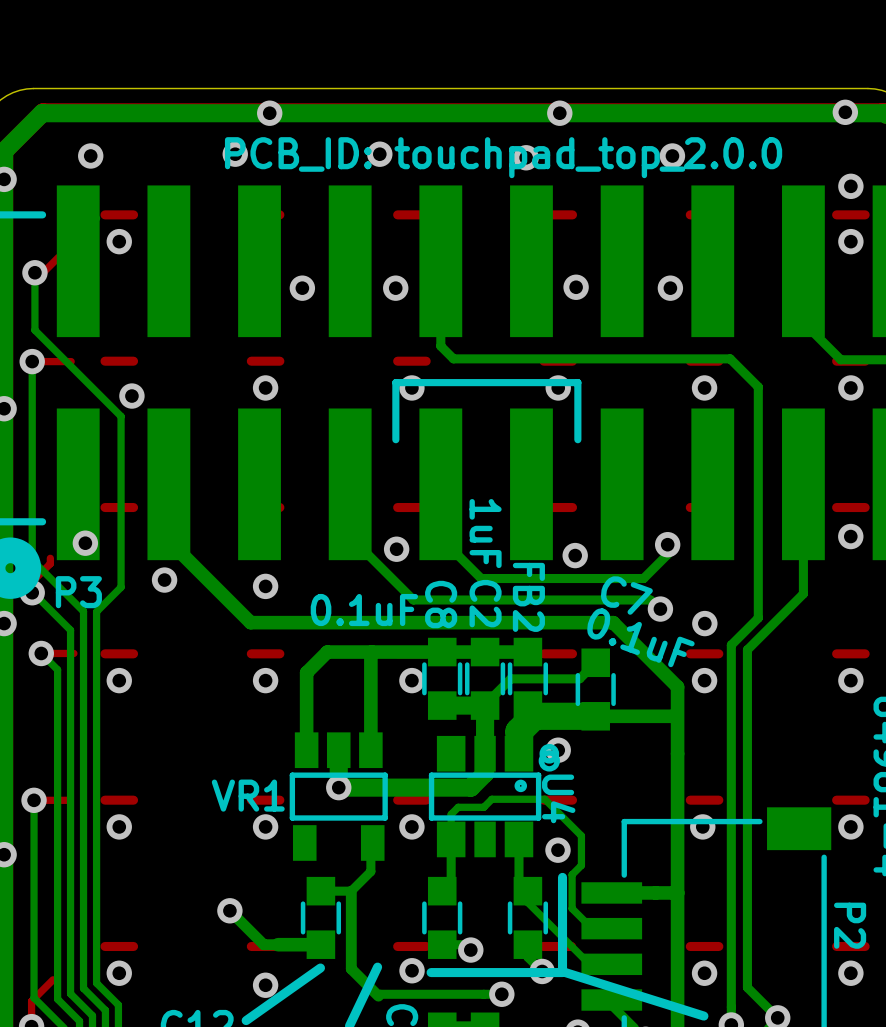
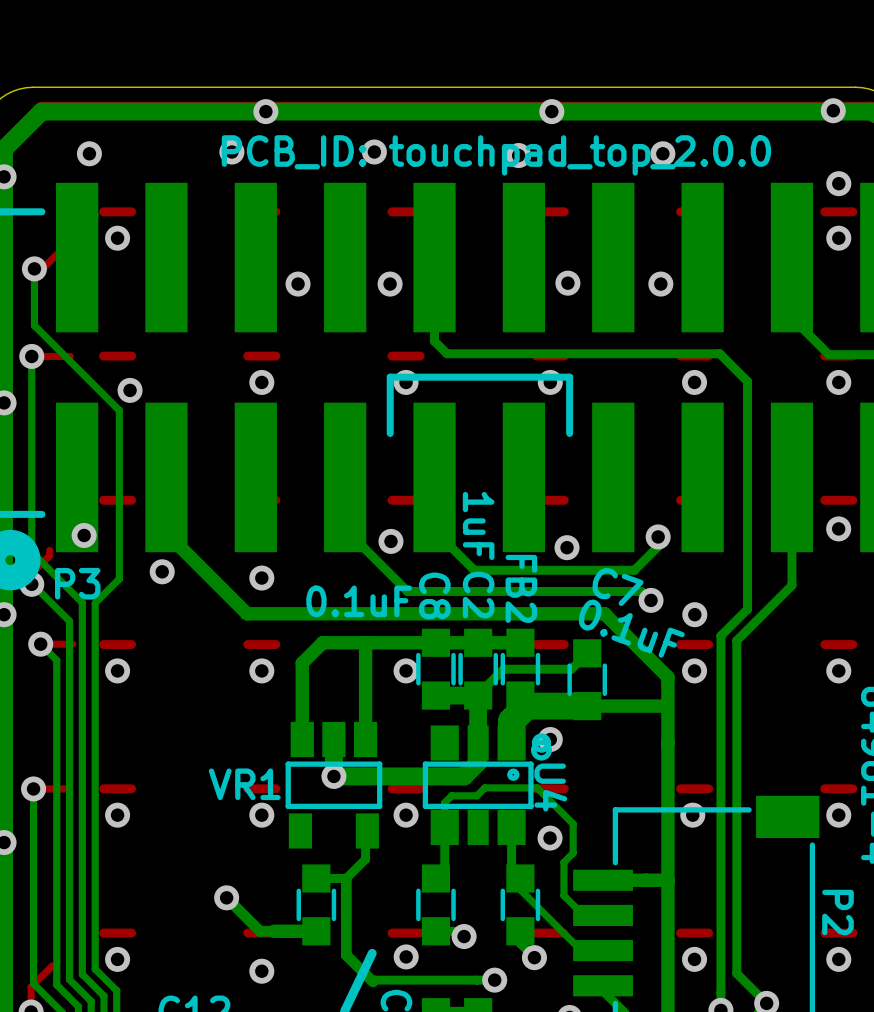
line: (562, 877) (562, 972) (431, 972) -> none
line: (320, 968) (246, 1020) -> none
line: (562, 971) (703, 1016) -> none

